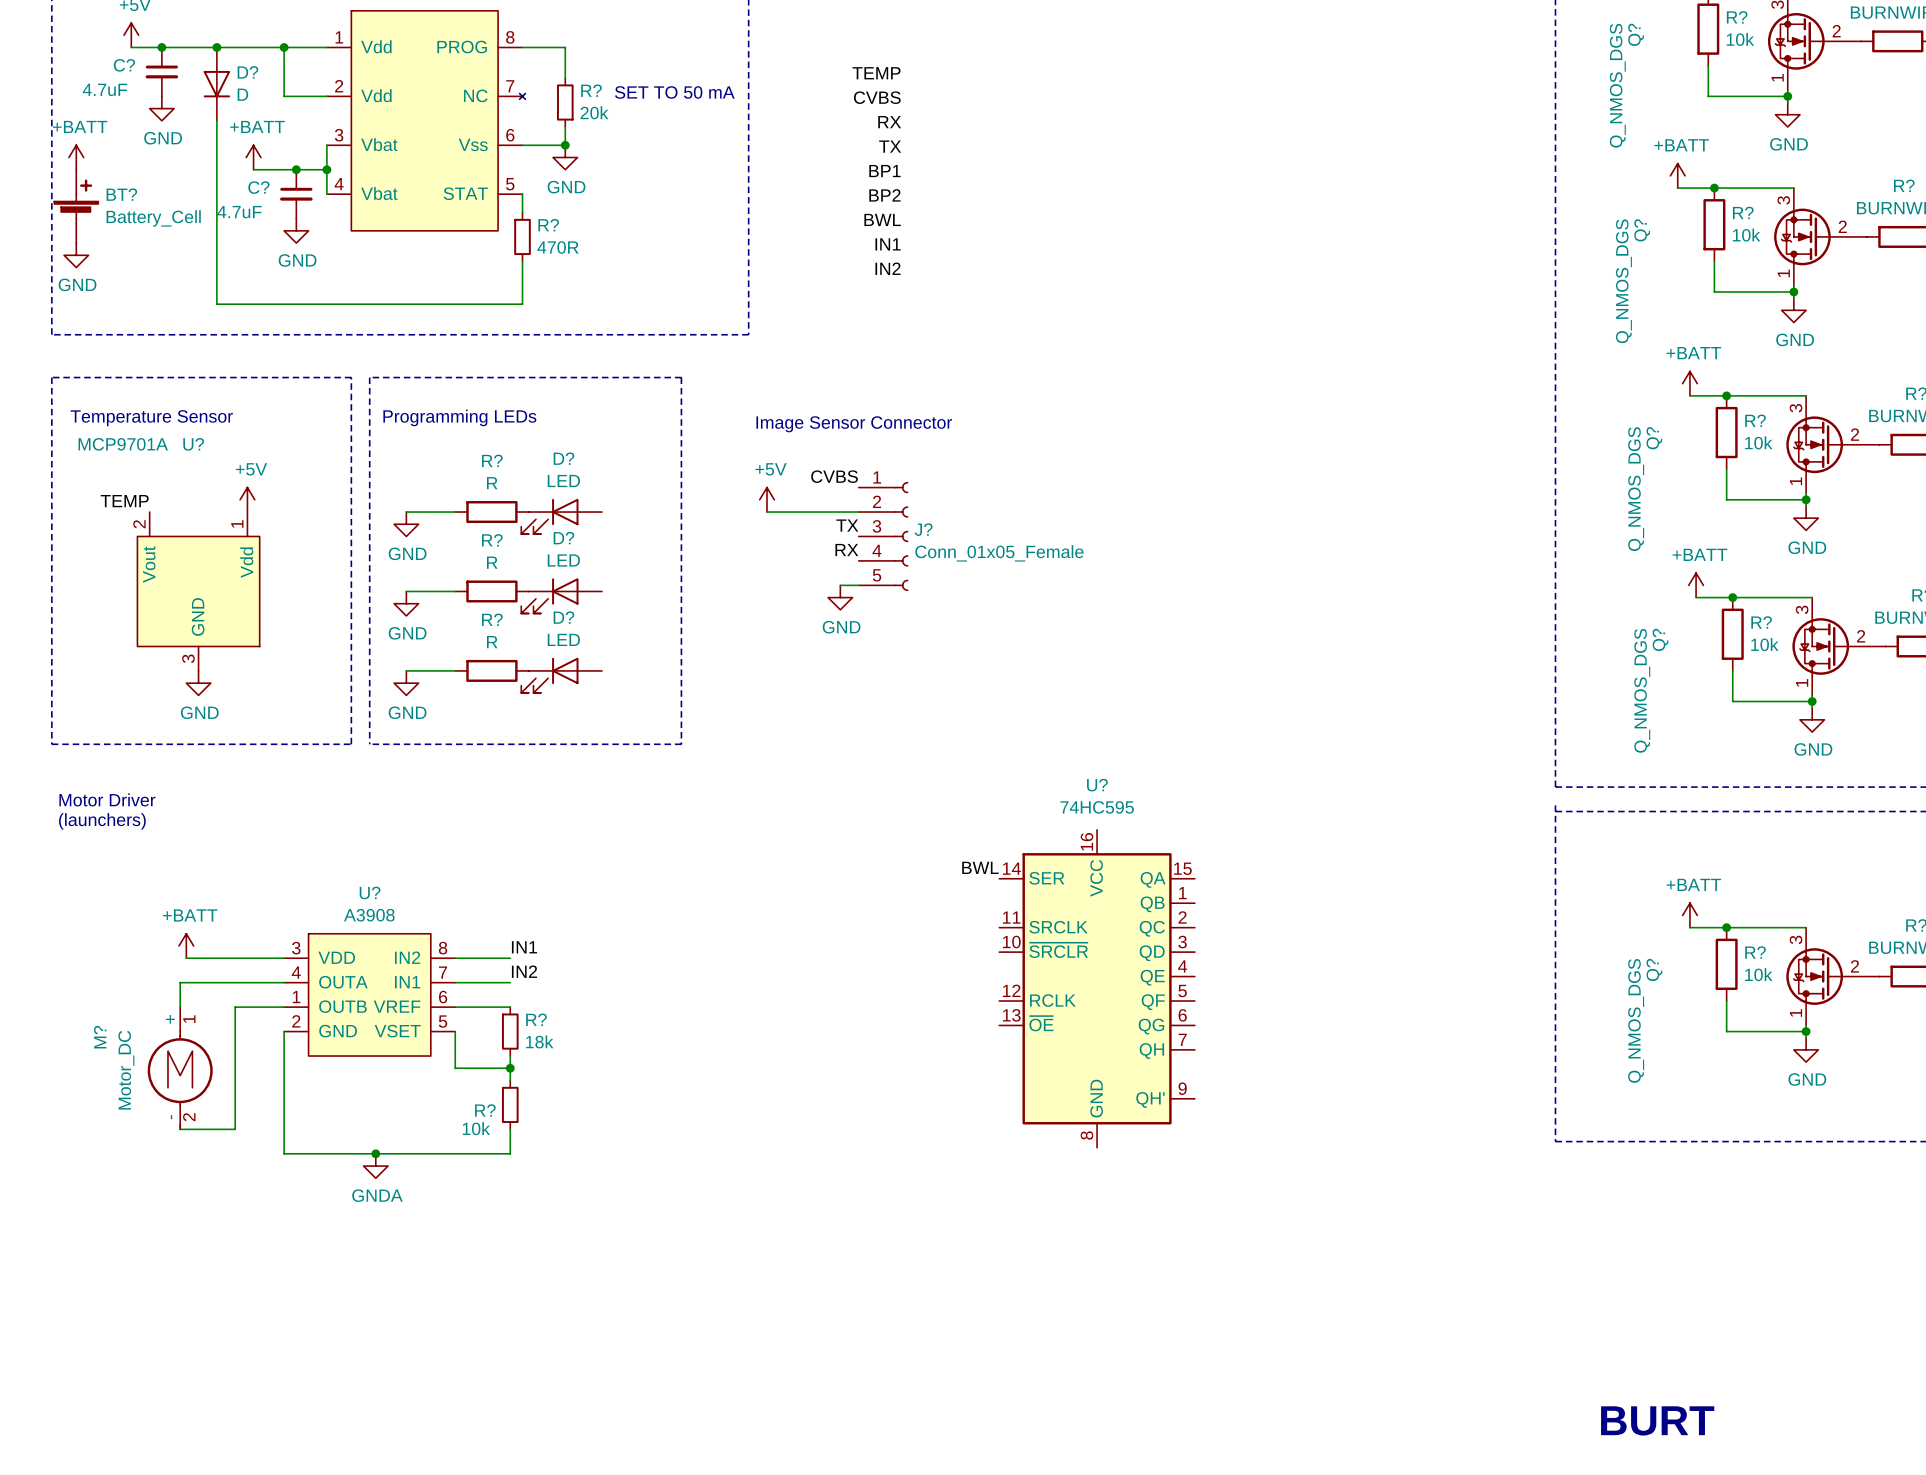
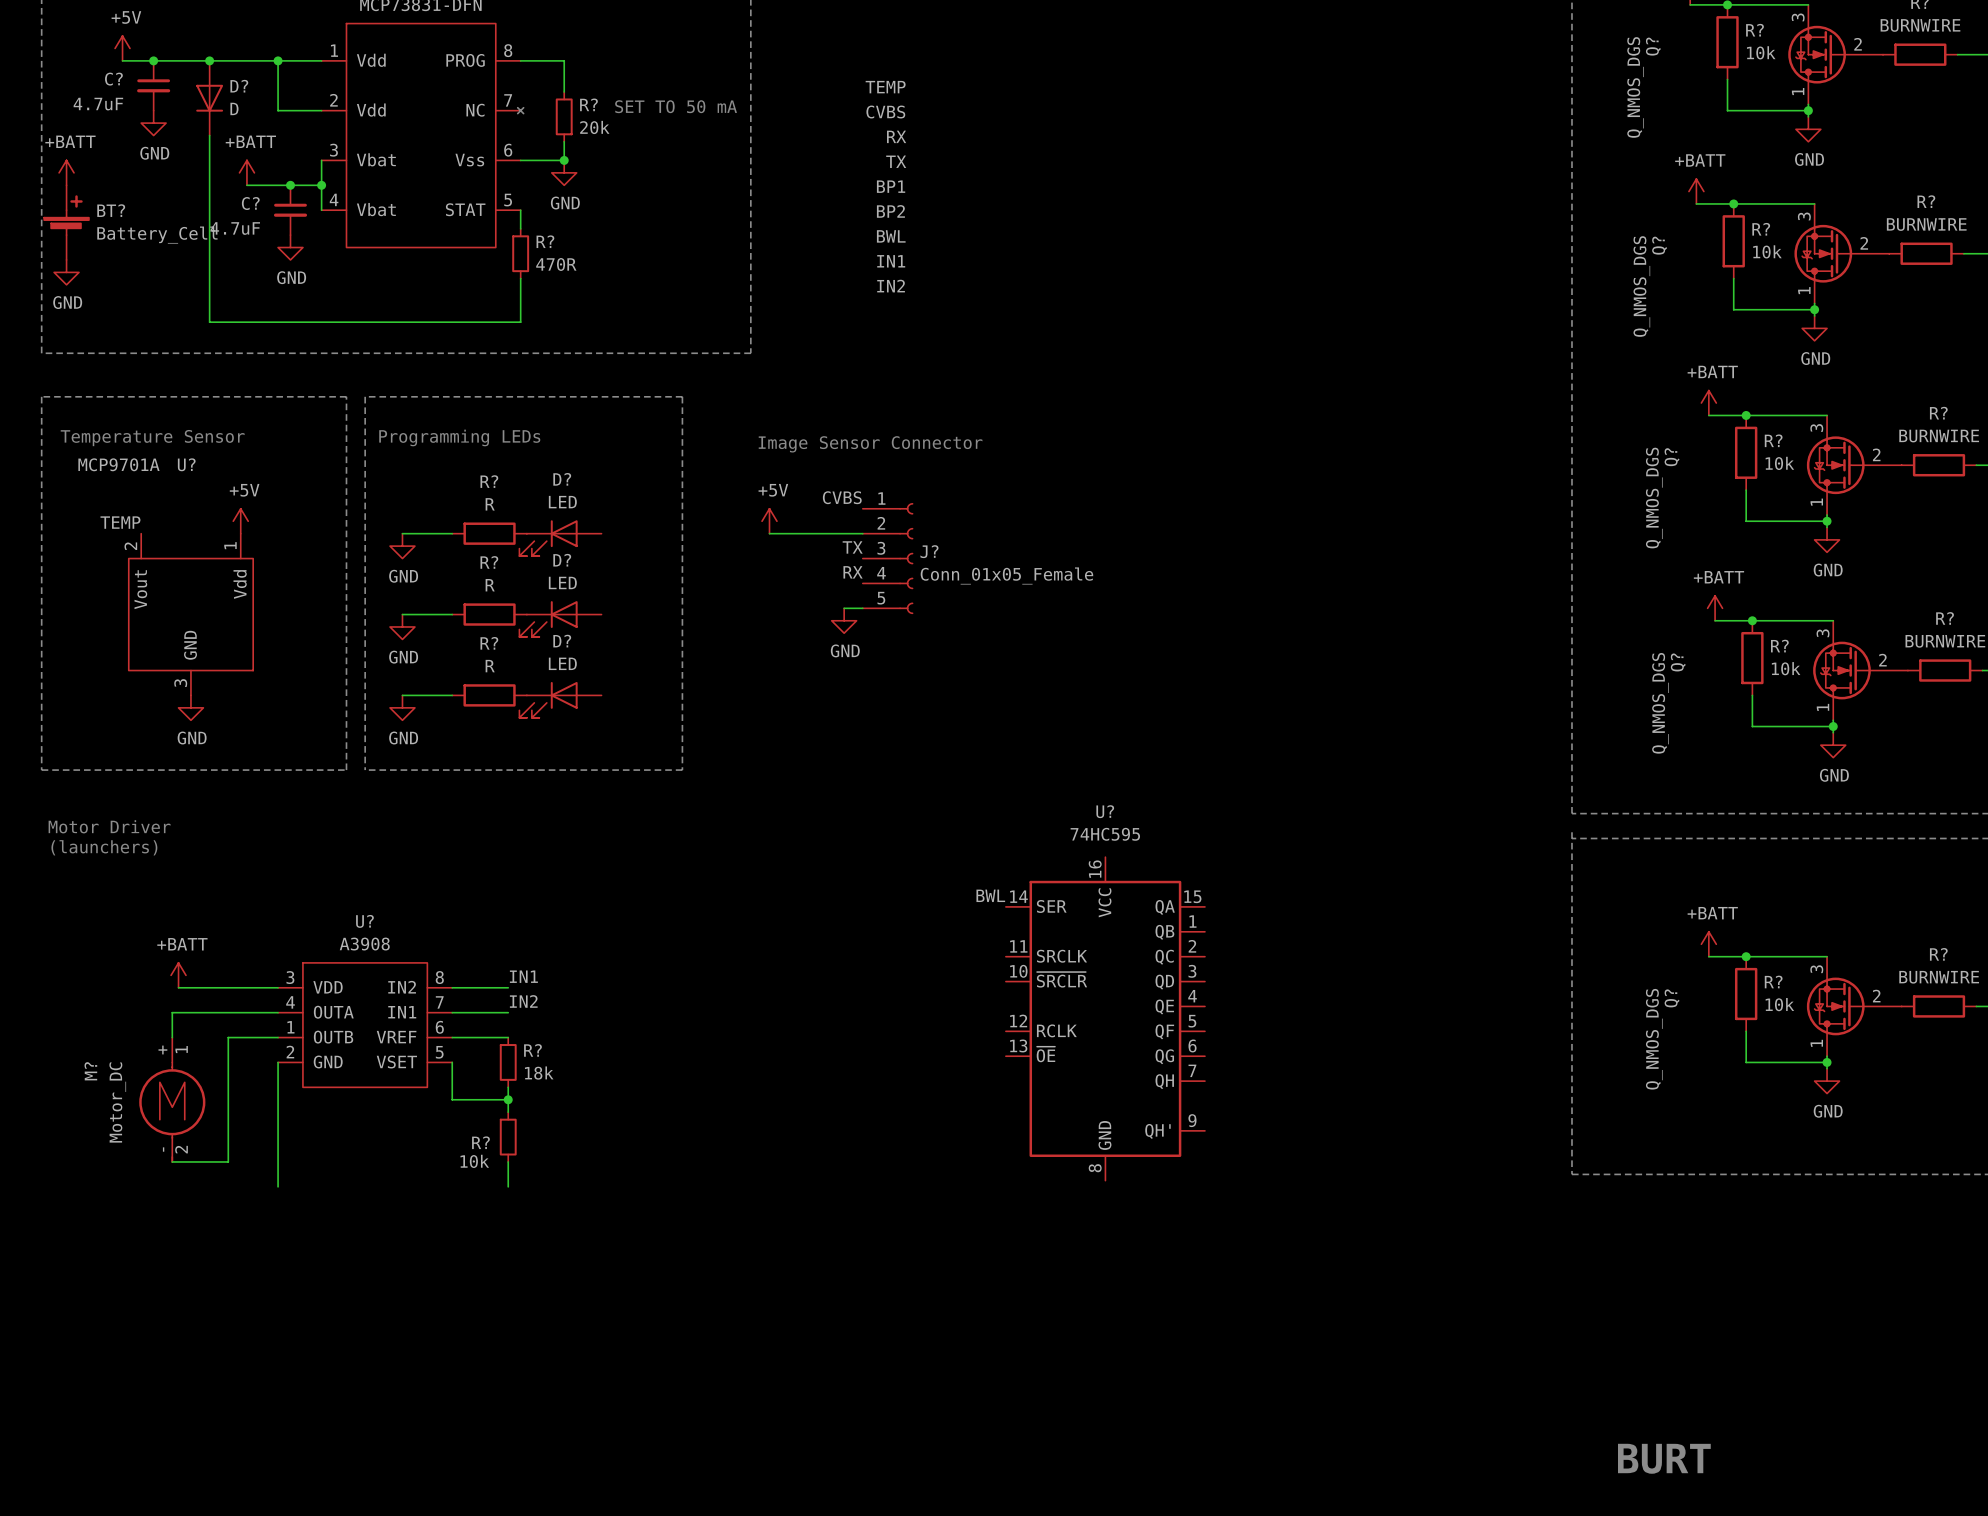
wire: (284, 1153) (510, 1153) -> none
junction: (375, 1153) -> none
power symbol: GNDA (375, 1166) -> none

